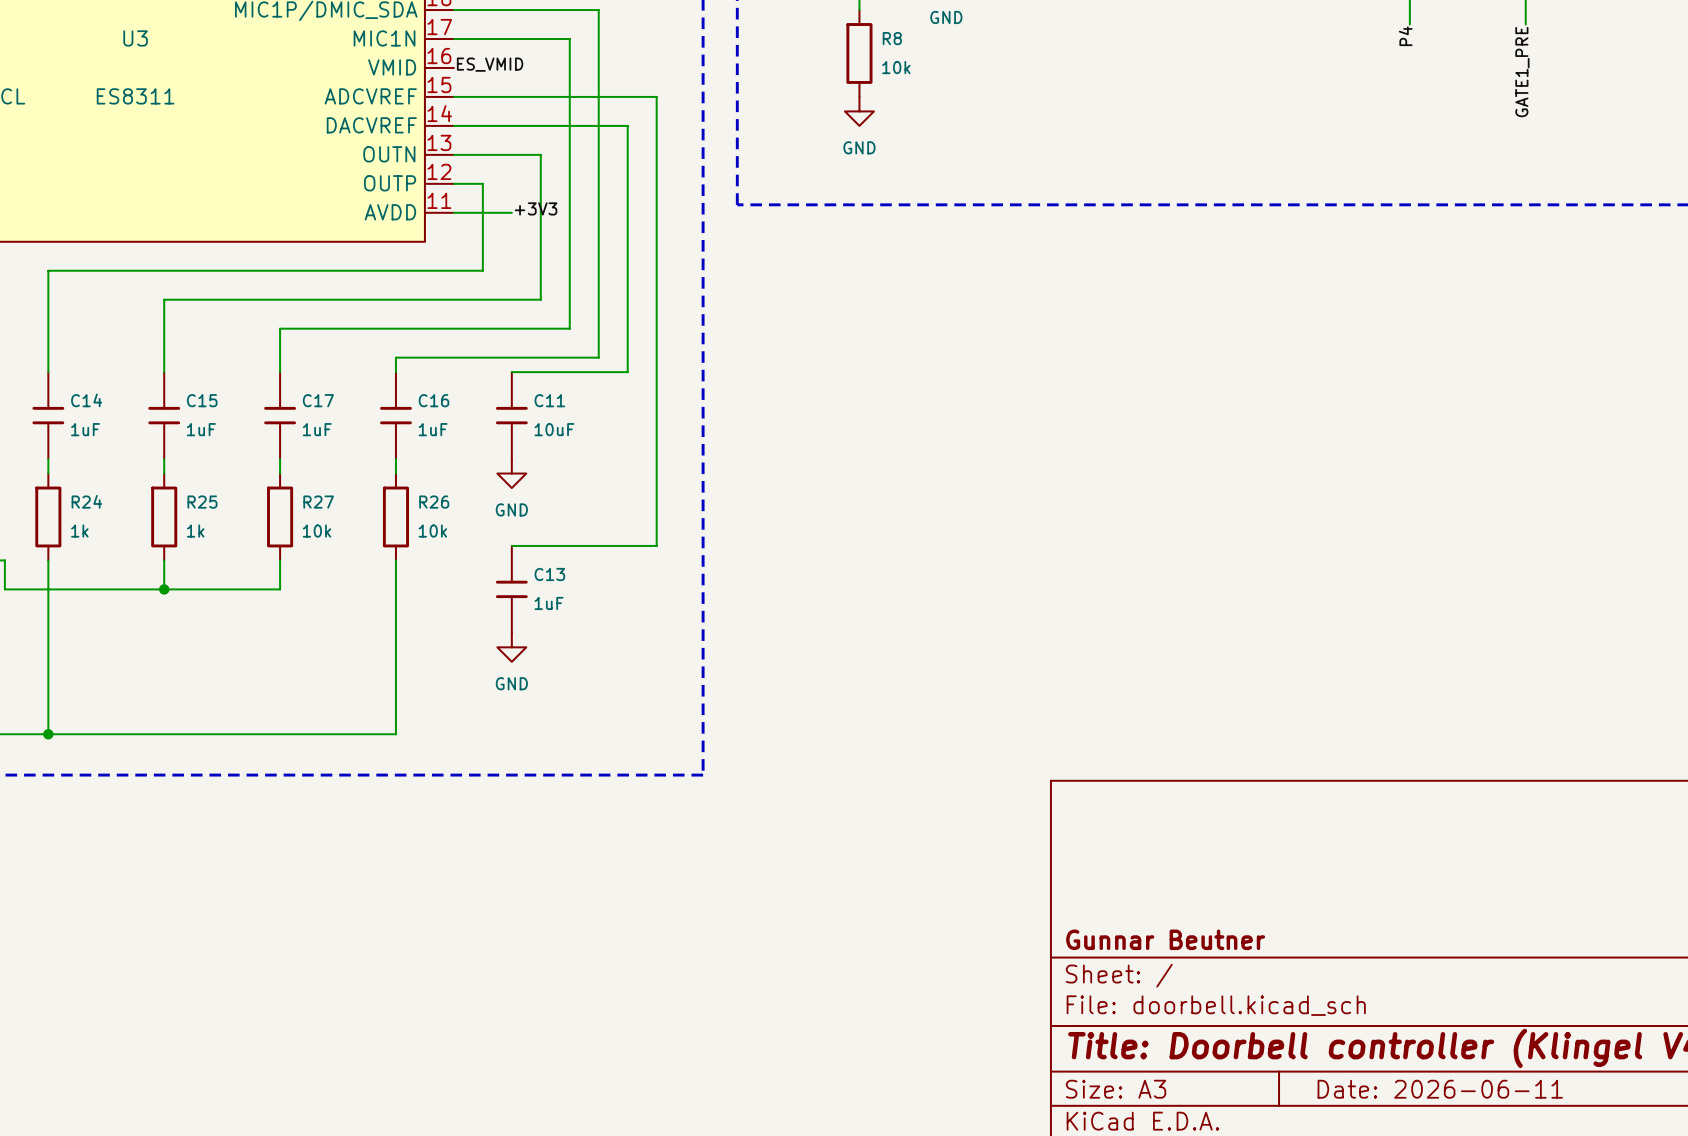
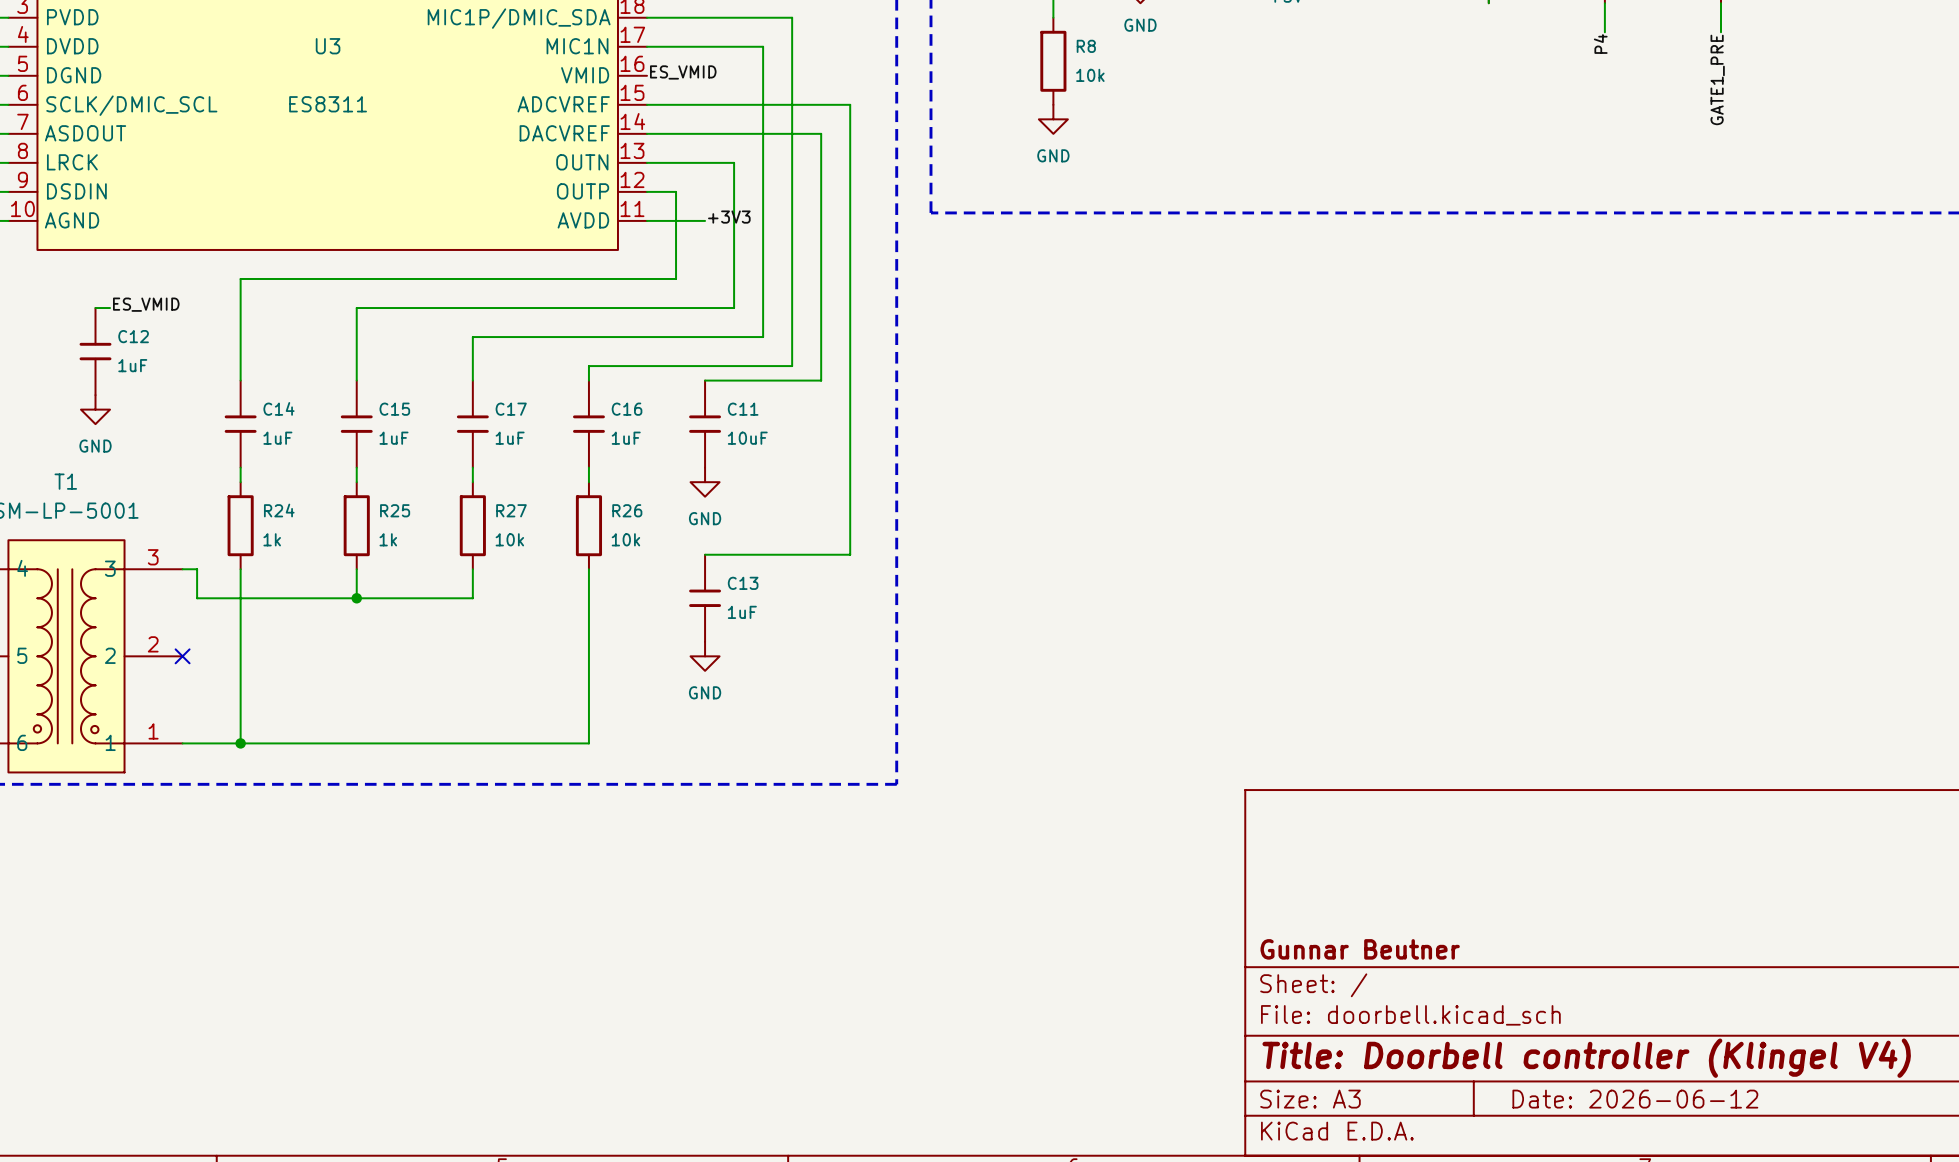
title block: Date: 2026-06-11 (1440, 1089) -> Date: 2026-06-12 (1635, 1099)

